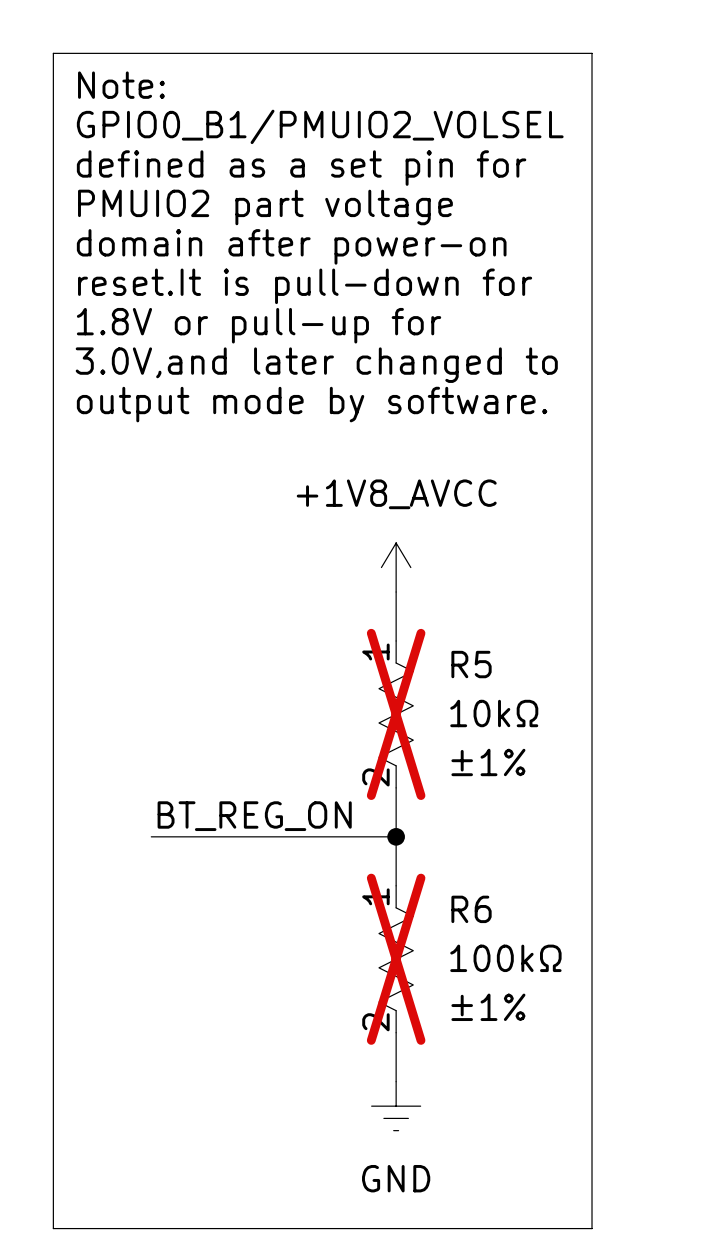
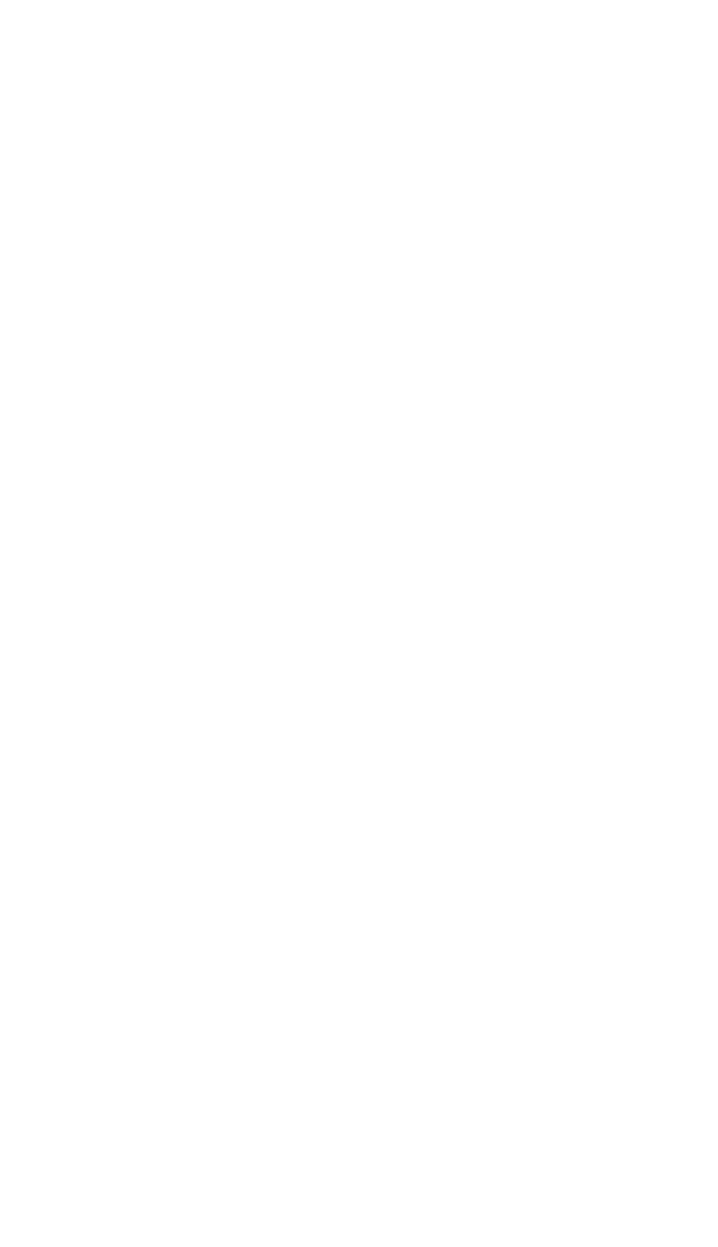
line: (53, 53) (592, 53) (592, 1228) (53, 1228) (53, 53) -> none
text: Note: (121, 85) -> none
text: GPIO0_B1/PMUIO2_VOLSEL (320, 126) -> none
text: defined as a set pin for (301, 168) -> none
text: PMUIO2 part voltage (265, 207) -> none
text: domain after power-on (291, 246) -> none
text: reset.It is pull-down for (305, 286) -> none
text: 1.8V or pull-up for (259, 325) -> none
text: 3.0V,and later changed to (316, 365) -> none
text: output mode by software. (312, 404) -> none
power symbol: +1V8_AVCC (396, 567) -> none
wire: (396, 592) (396, 640) -> none
R5: (396, 714) -> none
wire: (396, 787) (396, 885) -> none
label: BT_REG_ON (254, 816) -> none
wire: (151, 836) (396, 836) -> none
junction: (396, 836) -> none
R6: (396, 959) -> none
wire: (396, 1032) (396, 1081) -> none
power symbol: GND (396, 1106) -> none

